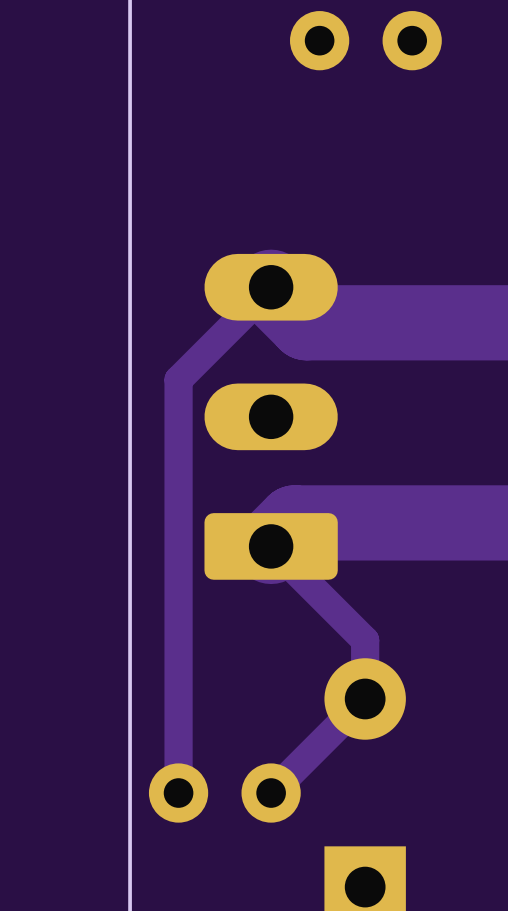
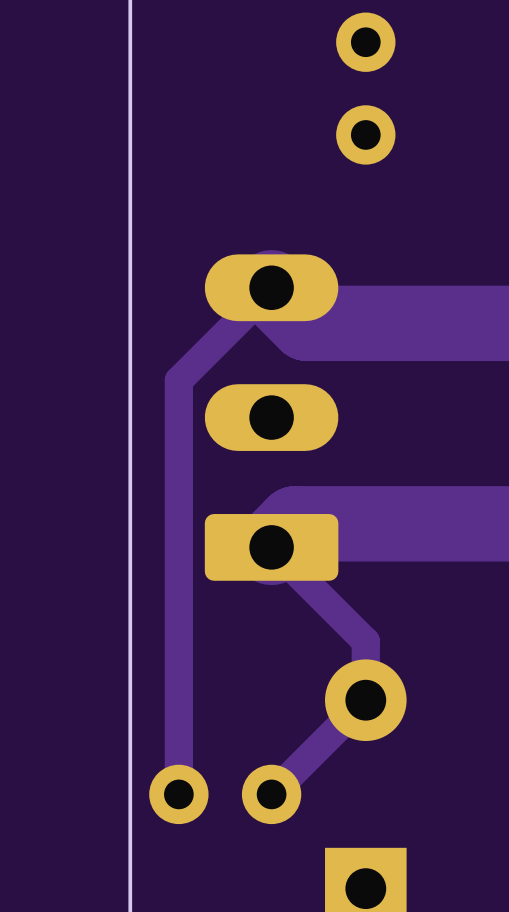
part rotation: 0° (365, 40) -> 90° clockwise (365, 88)

